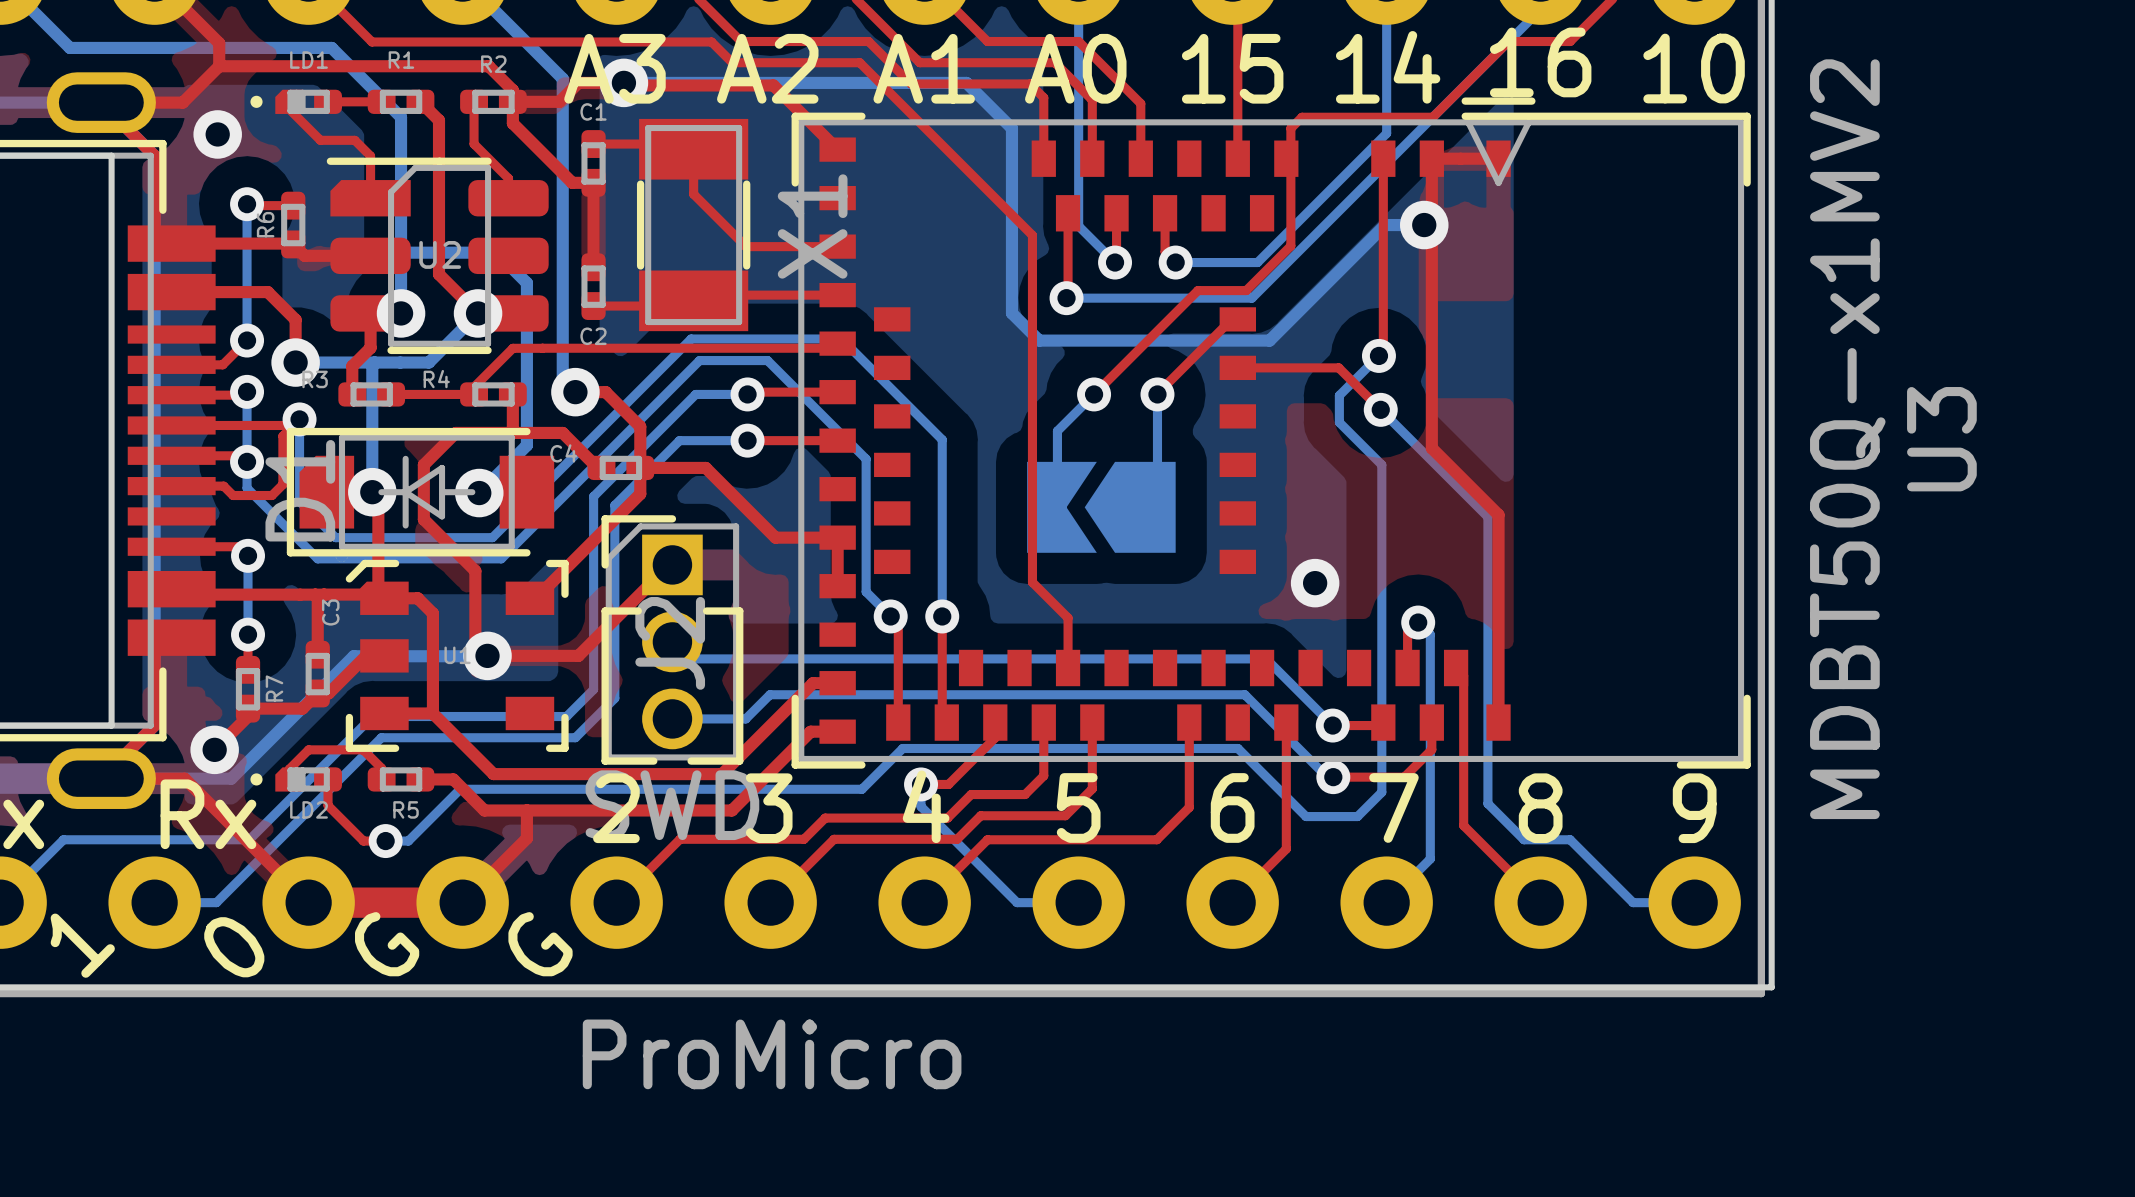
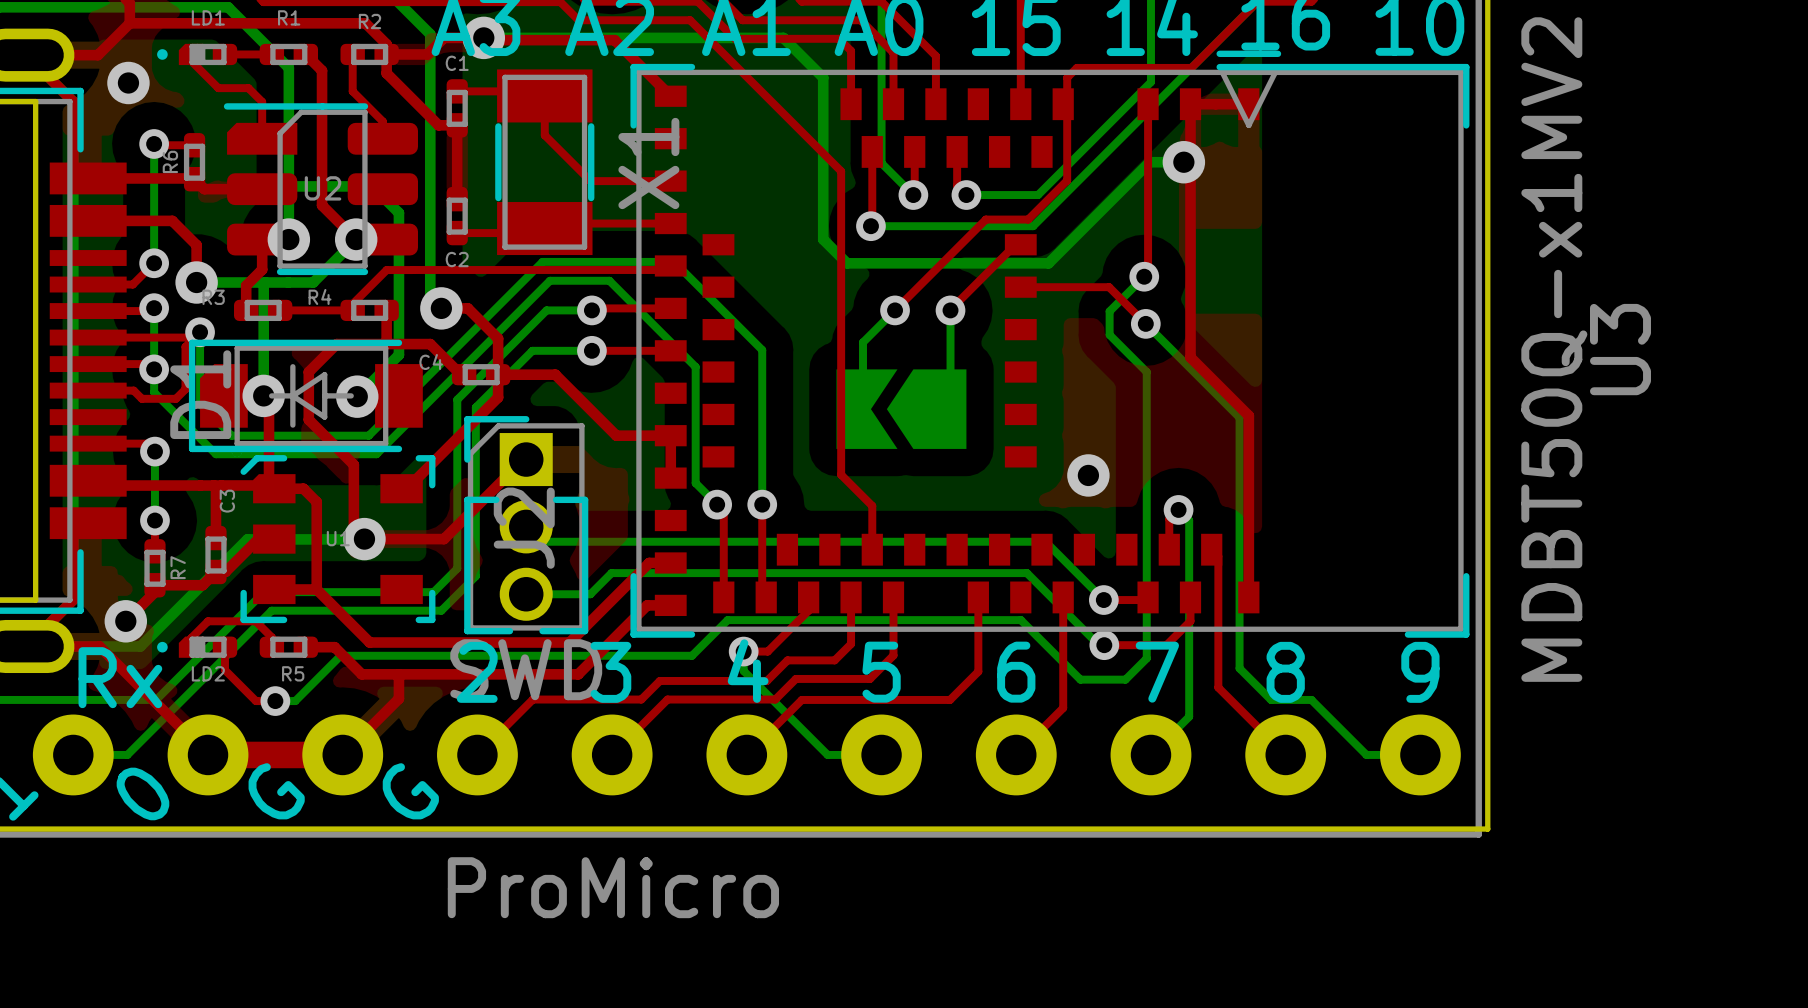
U3 name position: U3 (1941, 439) -> U3 (1620, 349)

